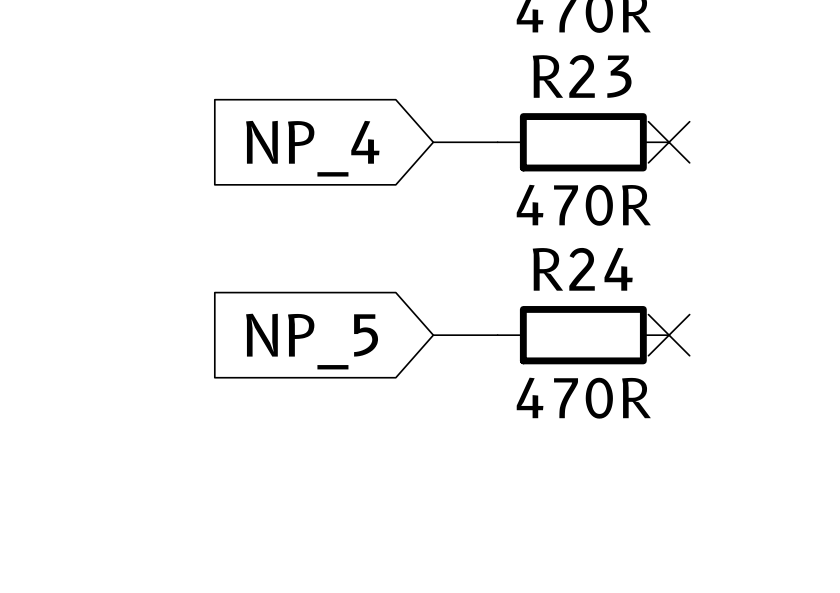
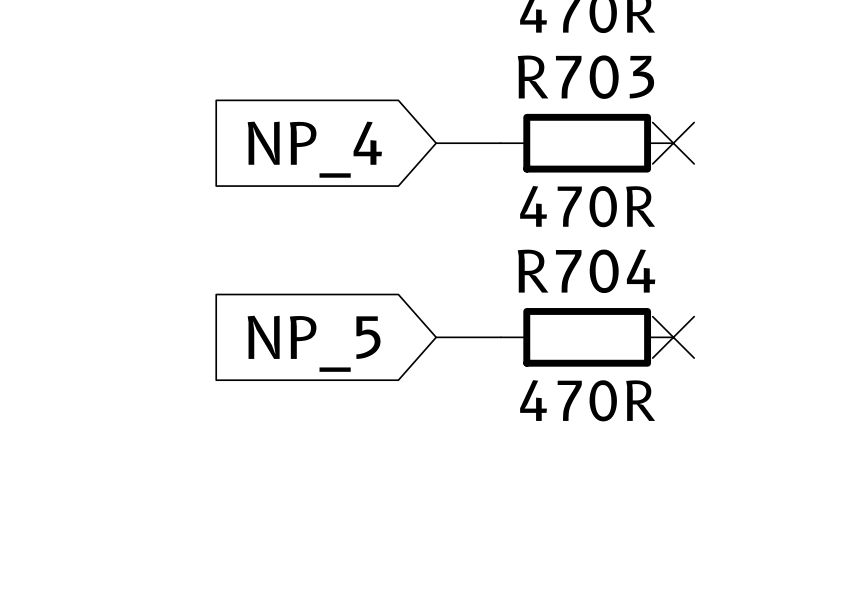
R23 name: R23 (582, 76) -> R703 (585, 77)
R24 name: R24 (582, 269) -> R704 (586, 271)

